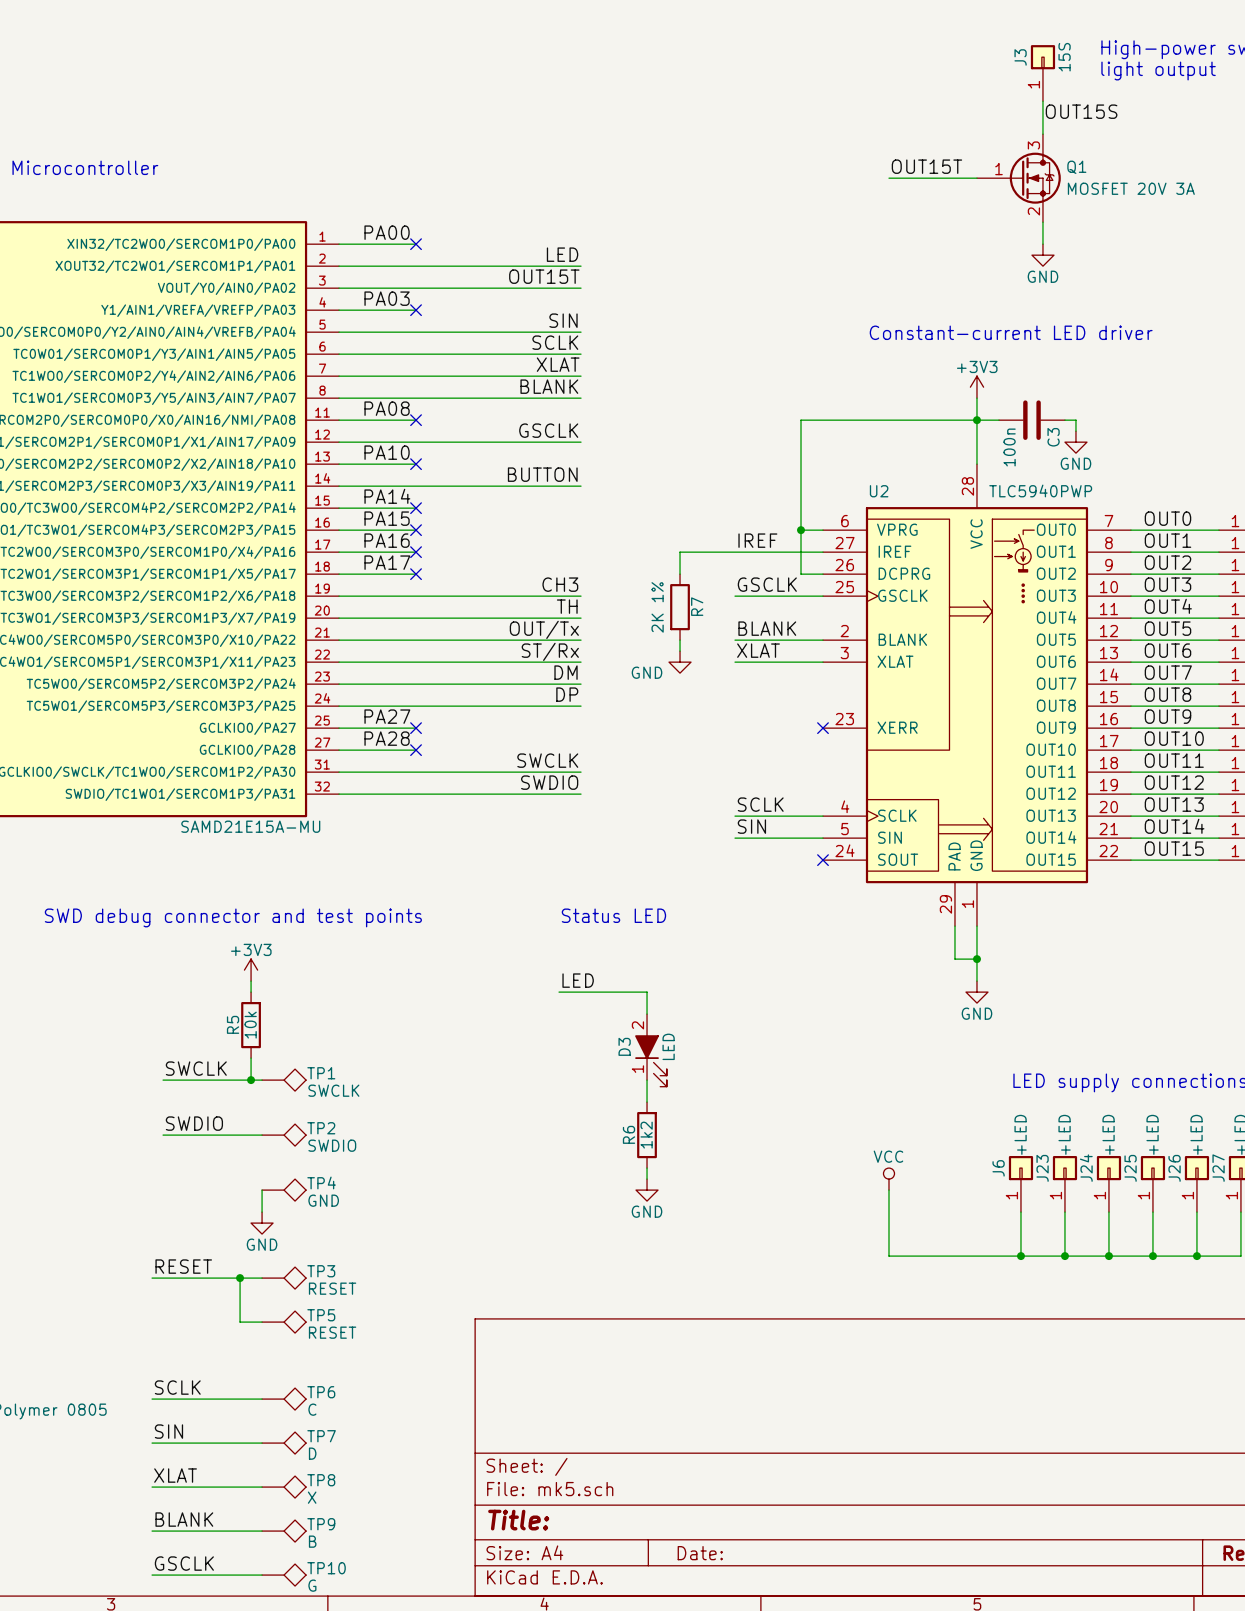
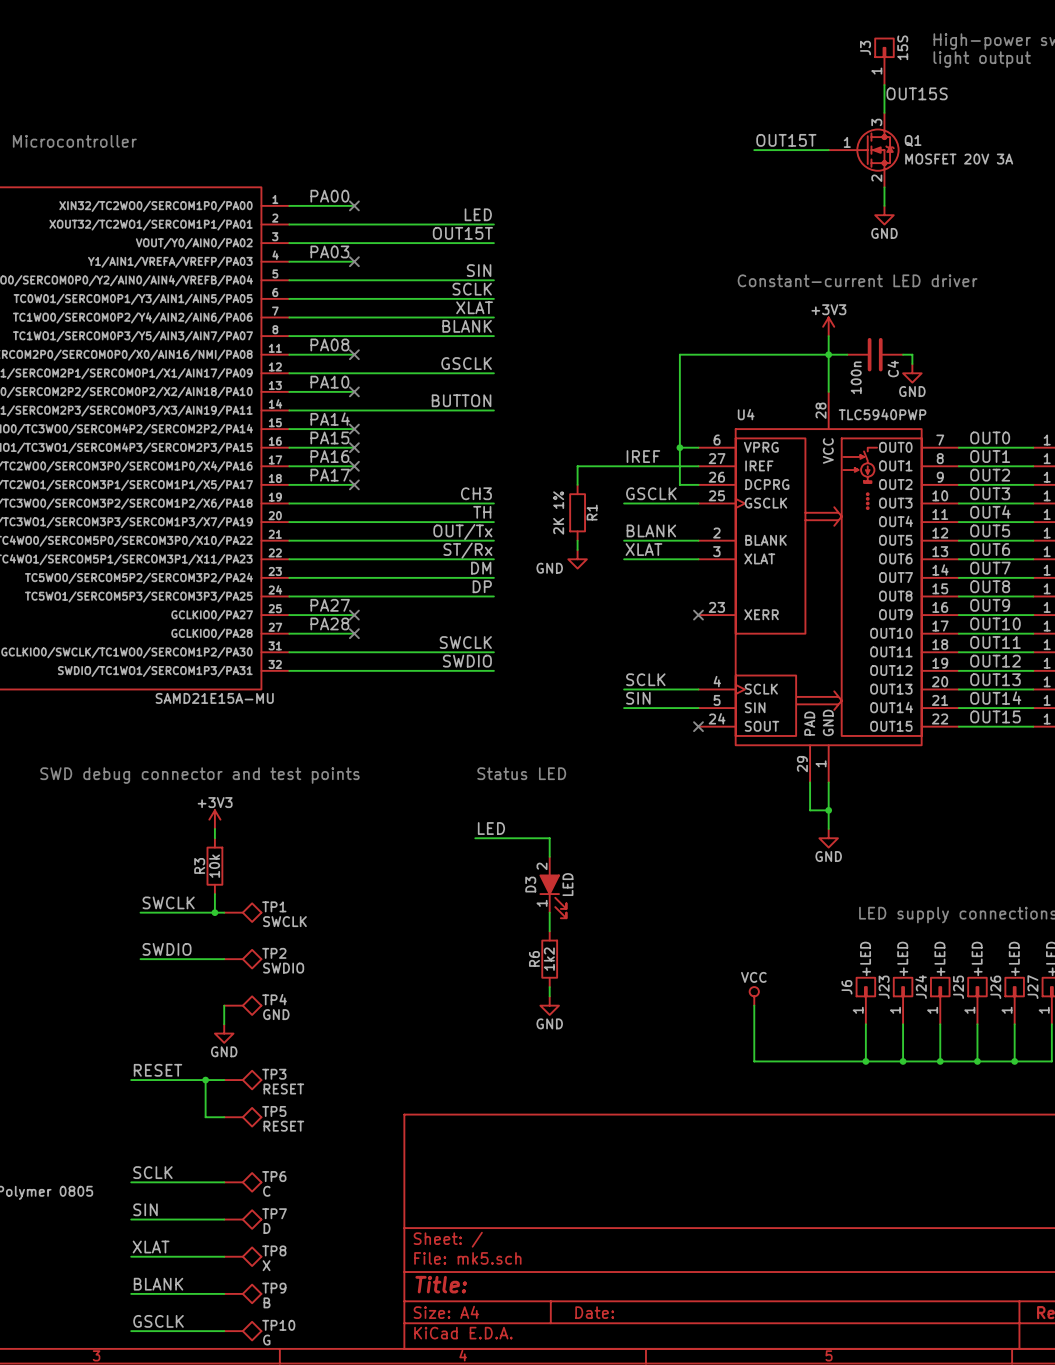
C3 name: C3 (1053, 437) -> C4 (893, 368)
U2 name: U2 (879, 491) -> U4 (746, 414)
R7 name: R7 (697, 606) -> R1 (592, 512)
R5 name: R5 (233, 1024) -> R3 (199, 865)

